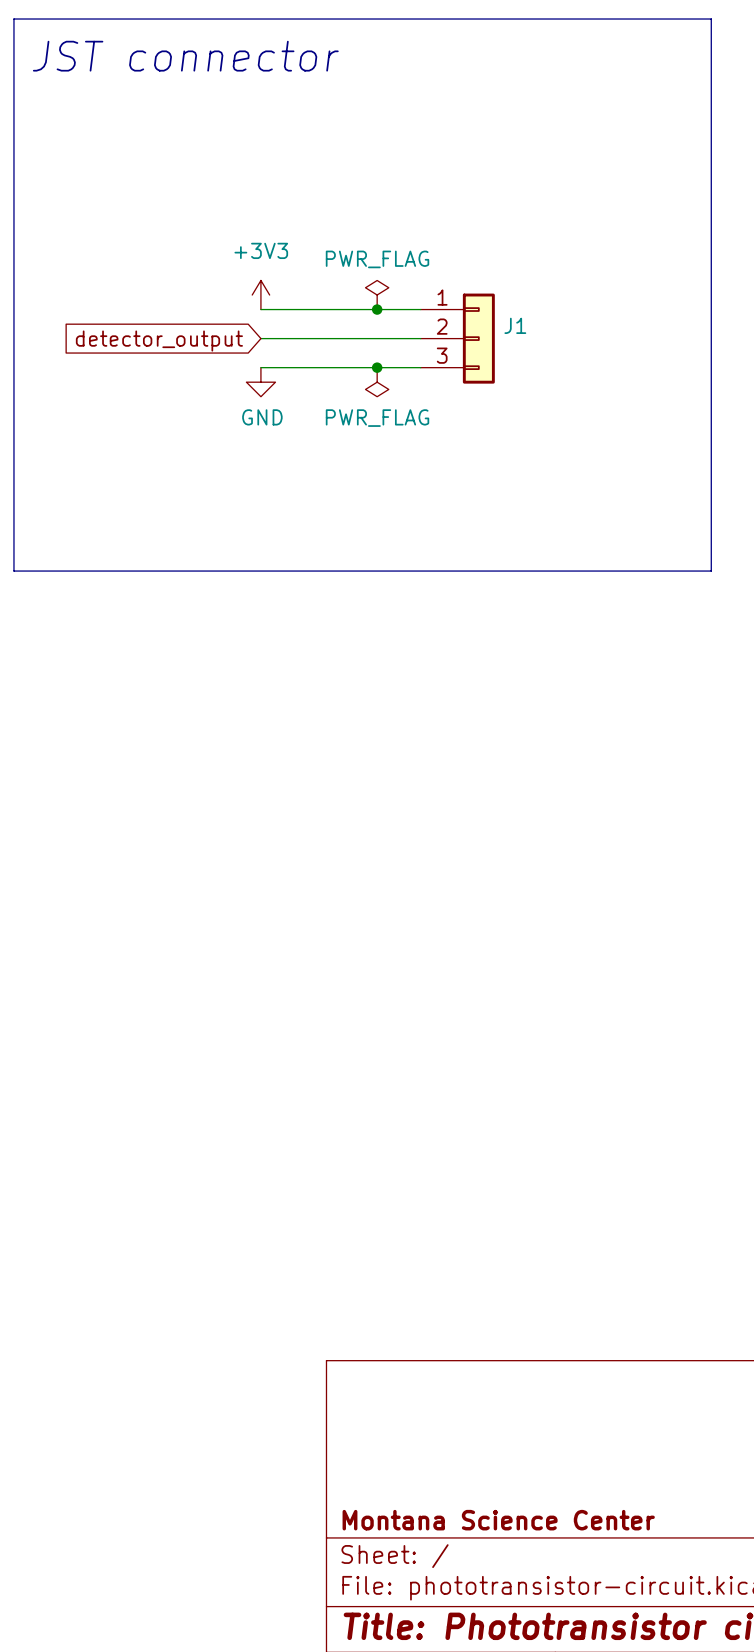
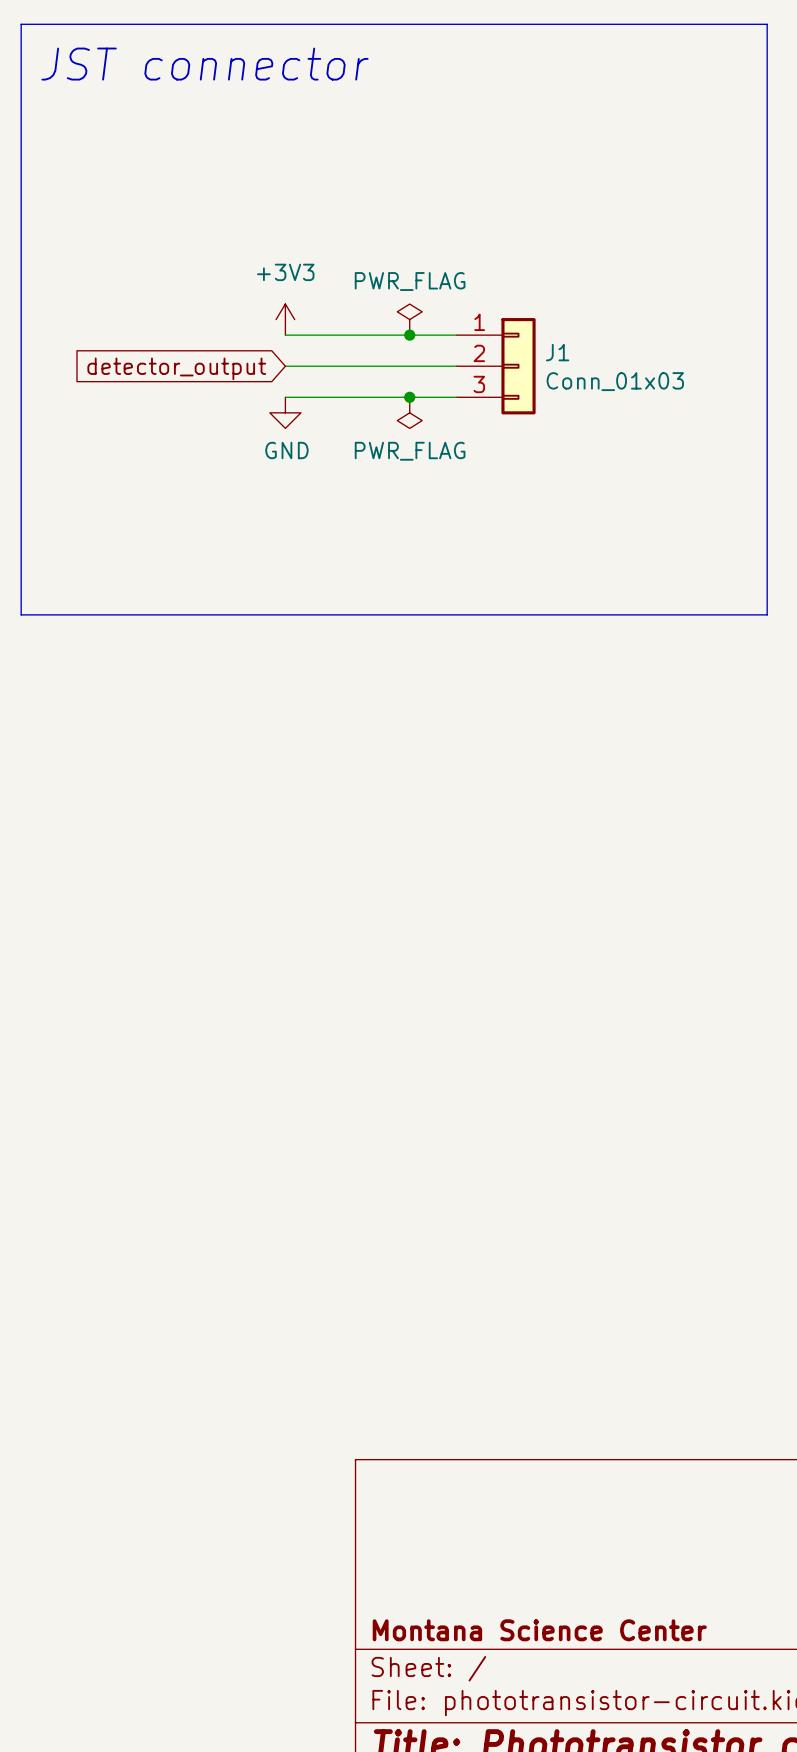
J1 value: none -> Conn_01x03 (615, 381)

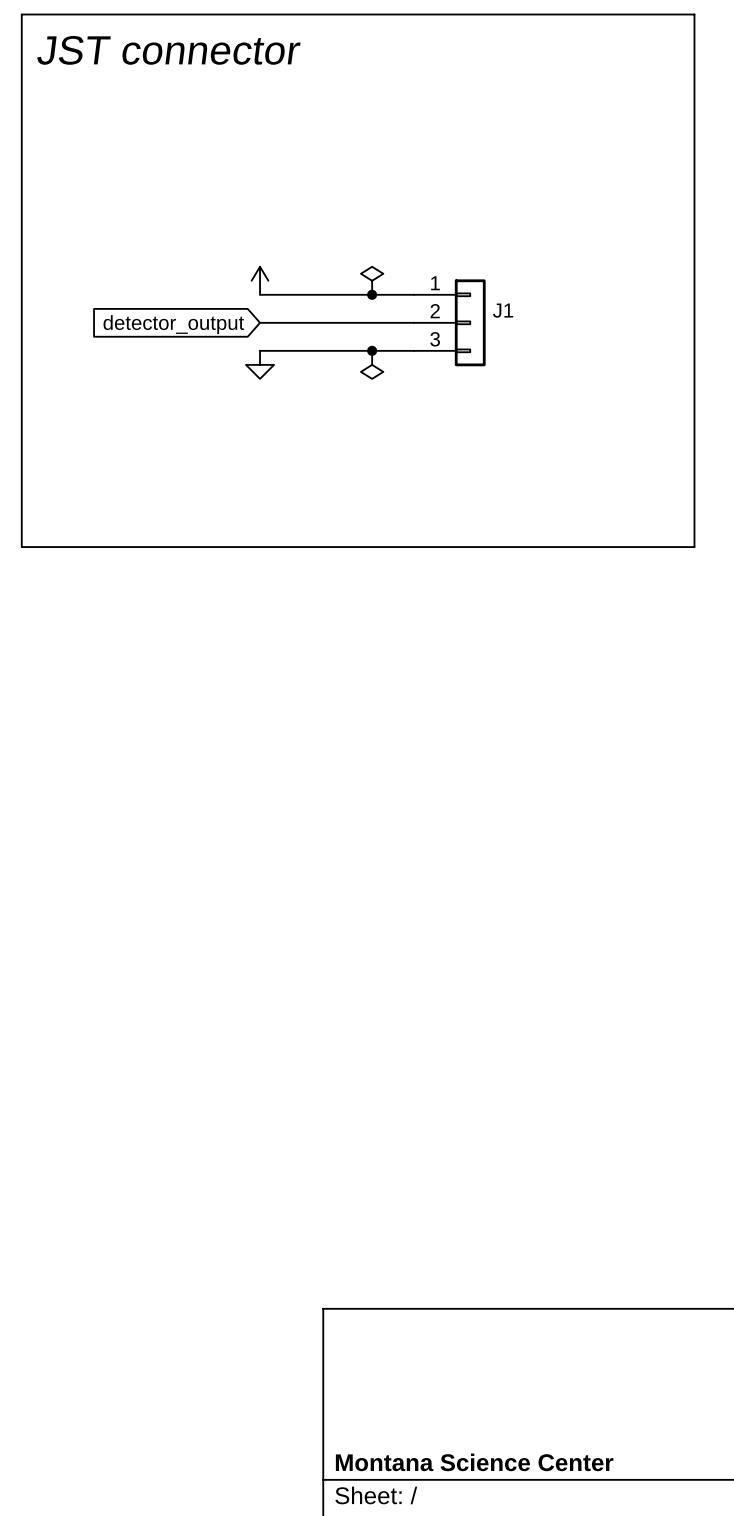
power symbol text: +3V3 (285, 272) -> none
power symbol text: PWR_FLAG (410, 281) -> none
J1 value: Conn_01x03 (615, 381) -> none
power symbol text: GND (286, 450) -> none
power symbol text: PWR_FLAG (410, 451) -> none

